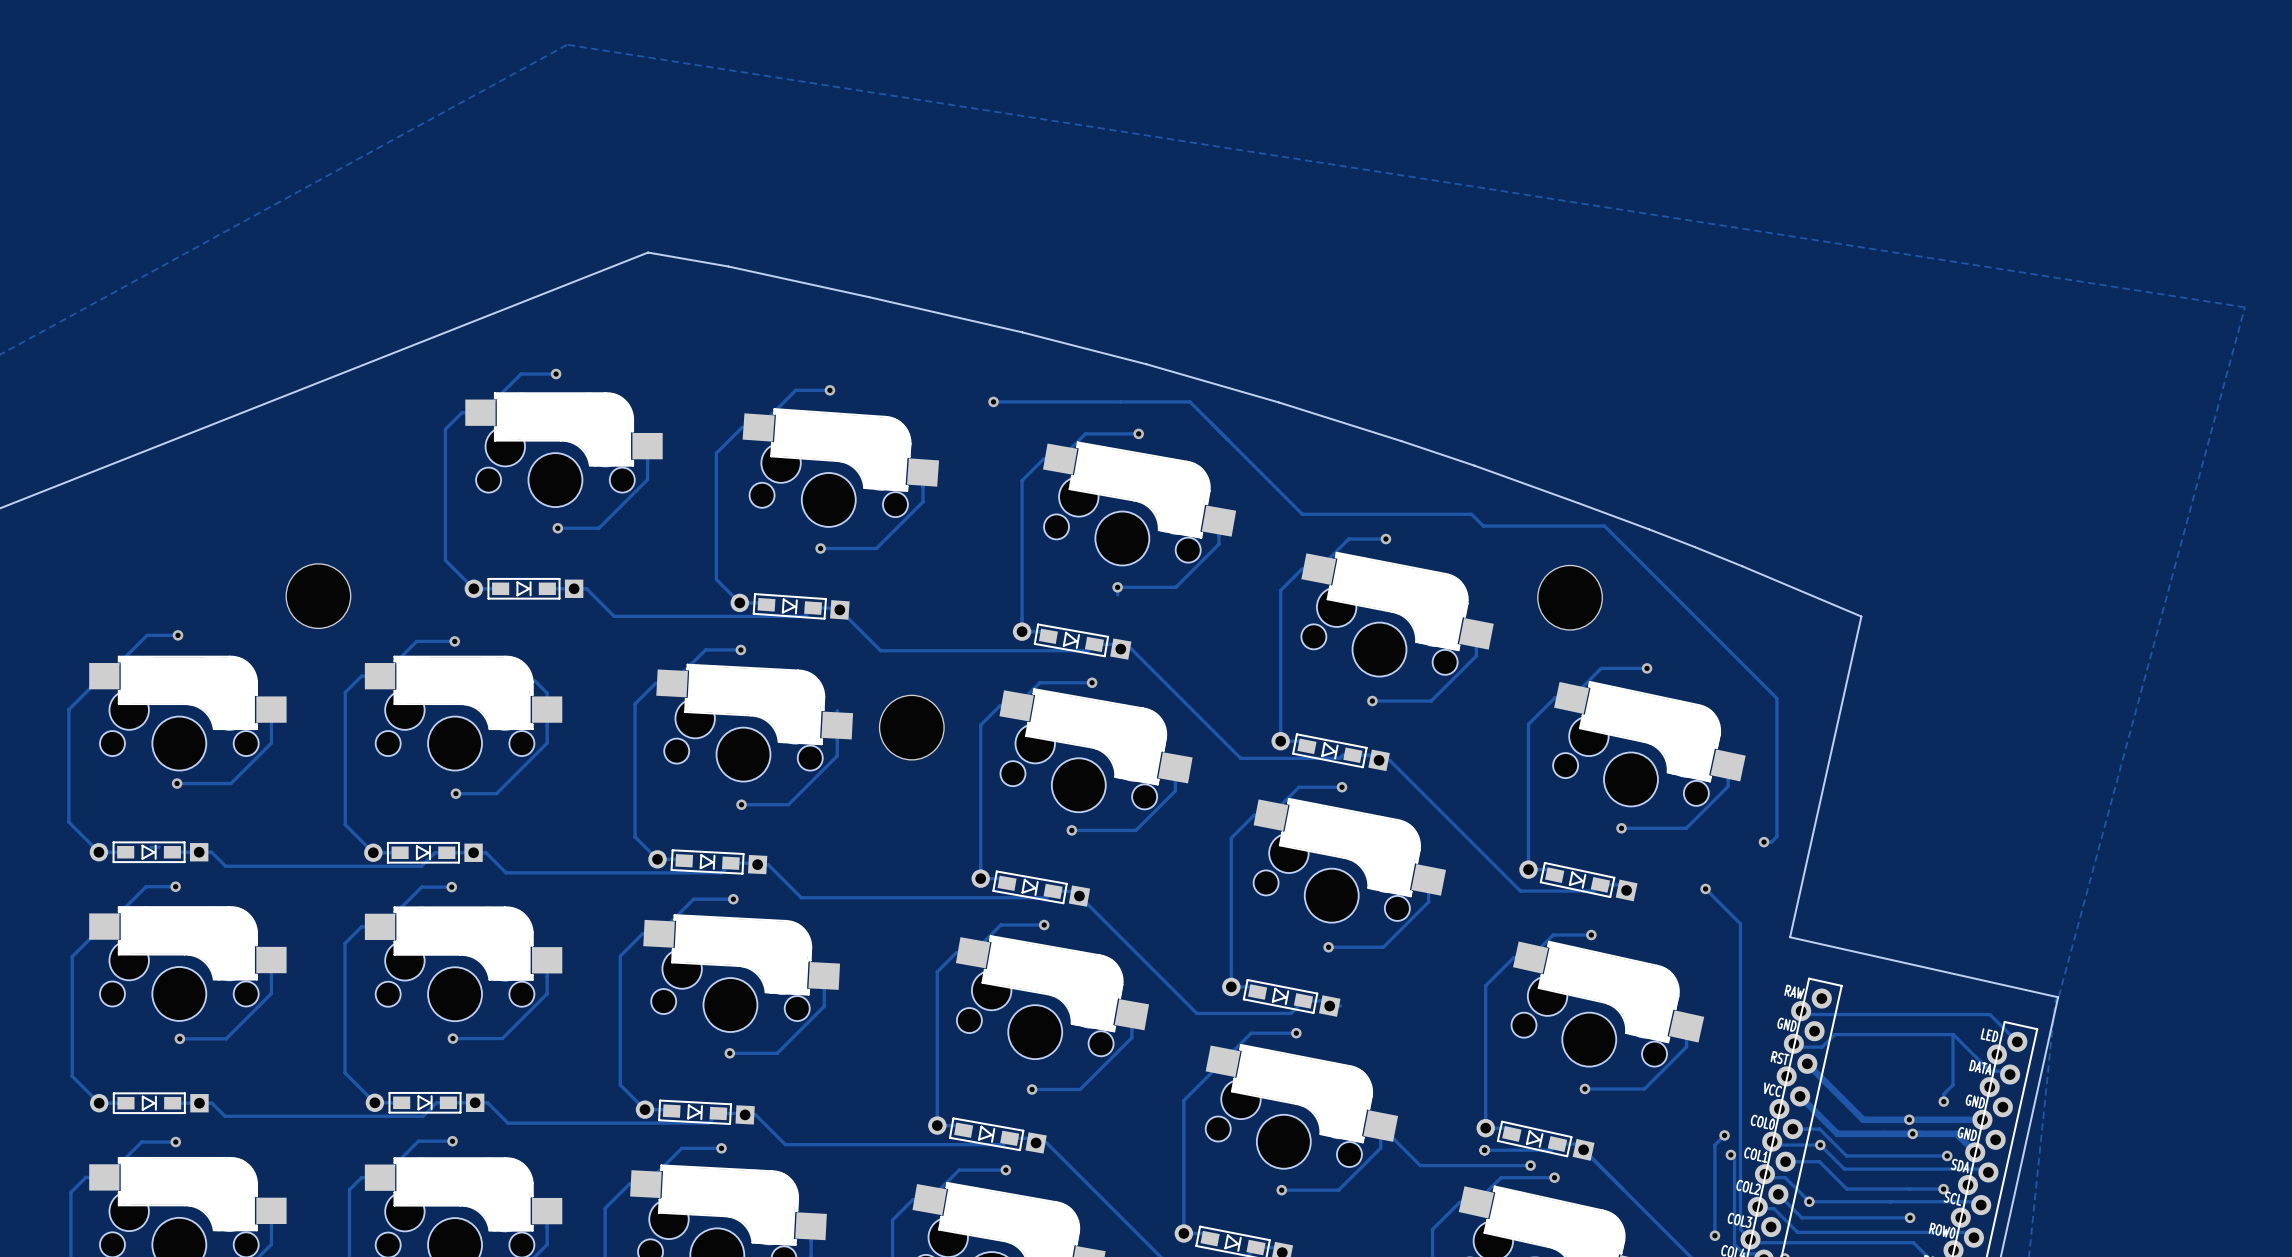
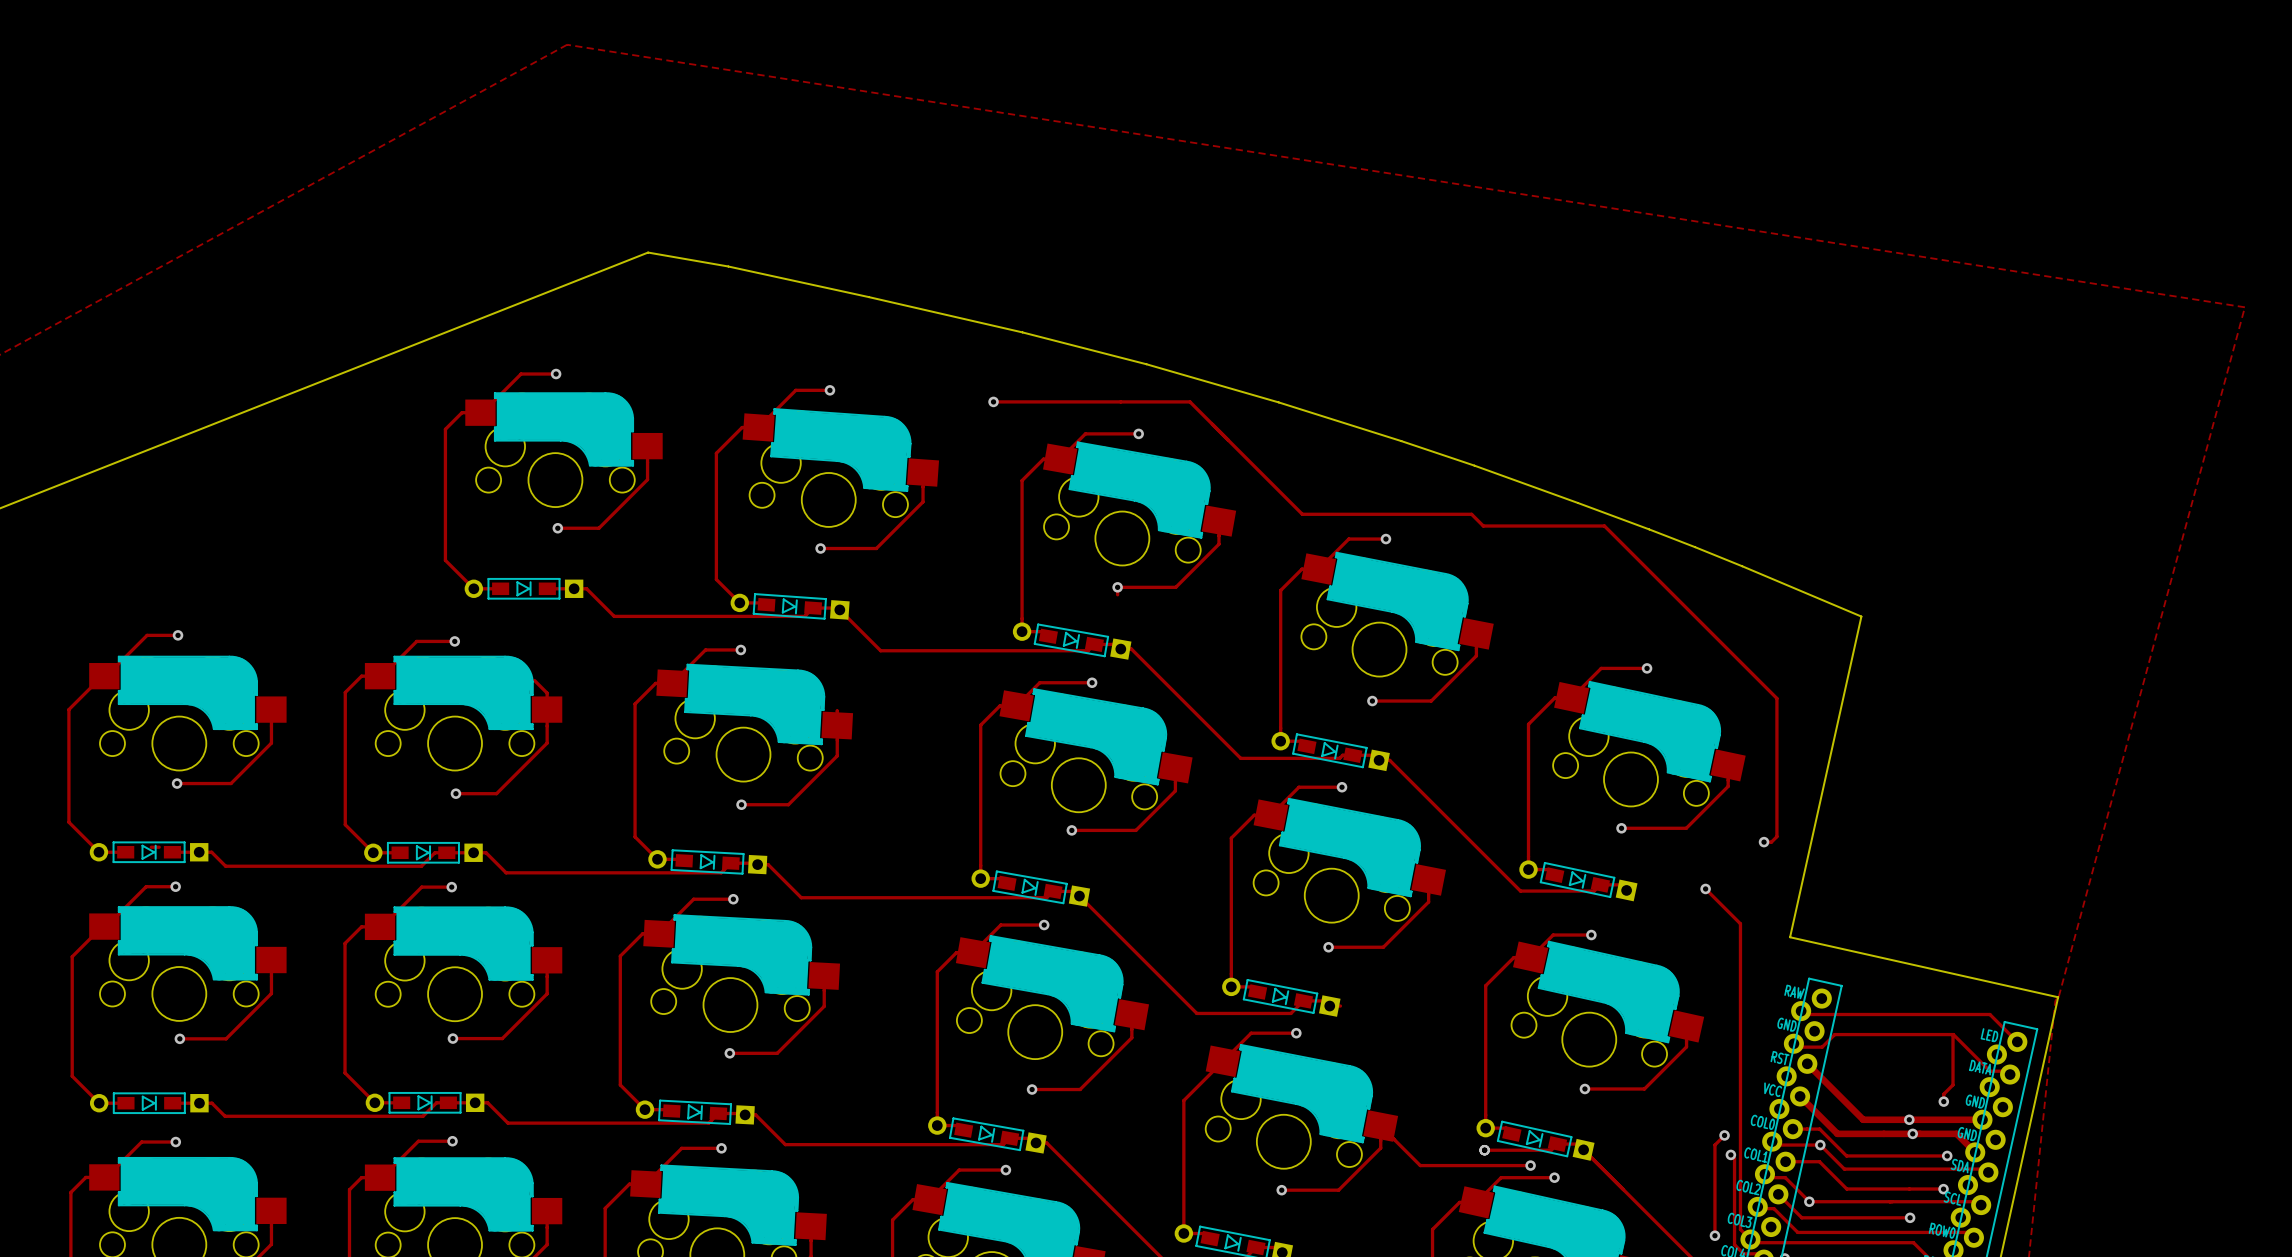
part: (318, 596) -> none
part: (1570, 597) -> none
part: (911, 727) -> none

